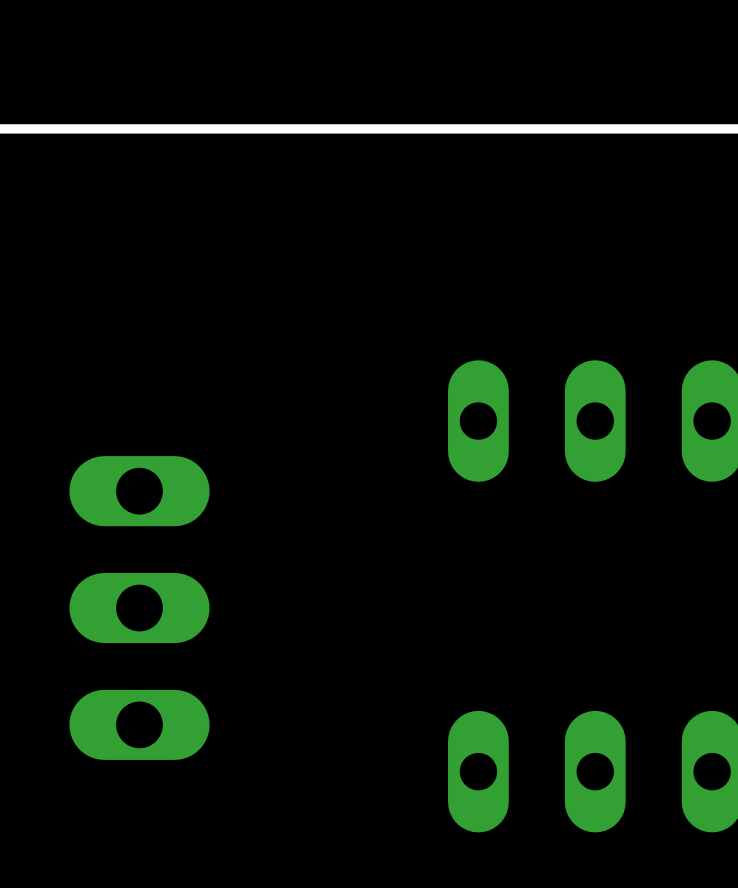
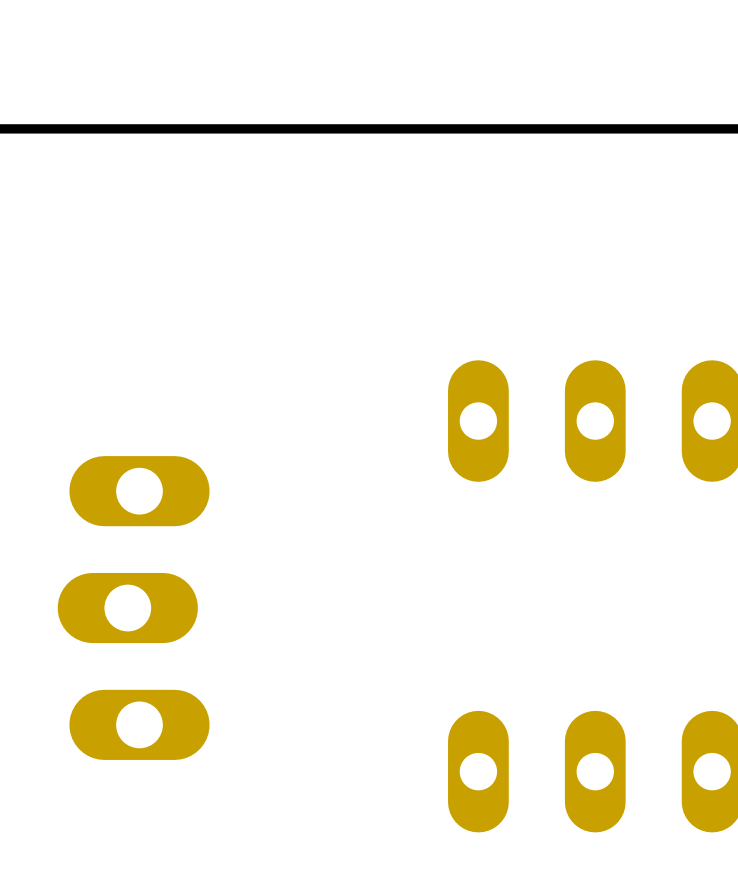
part footprint: [69, 456, 210, 760] -> [57, 456, 210, 760]

